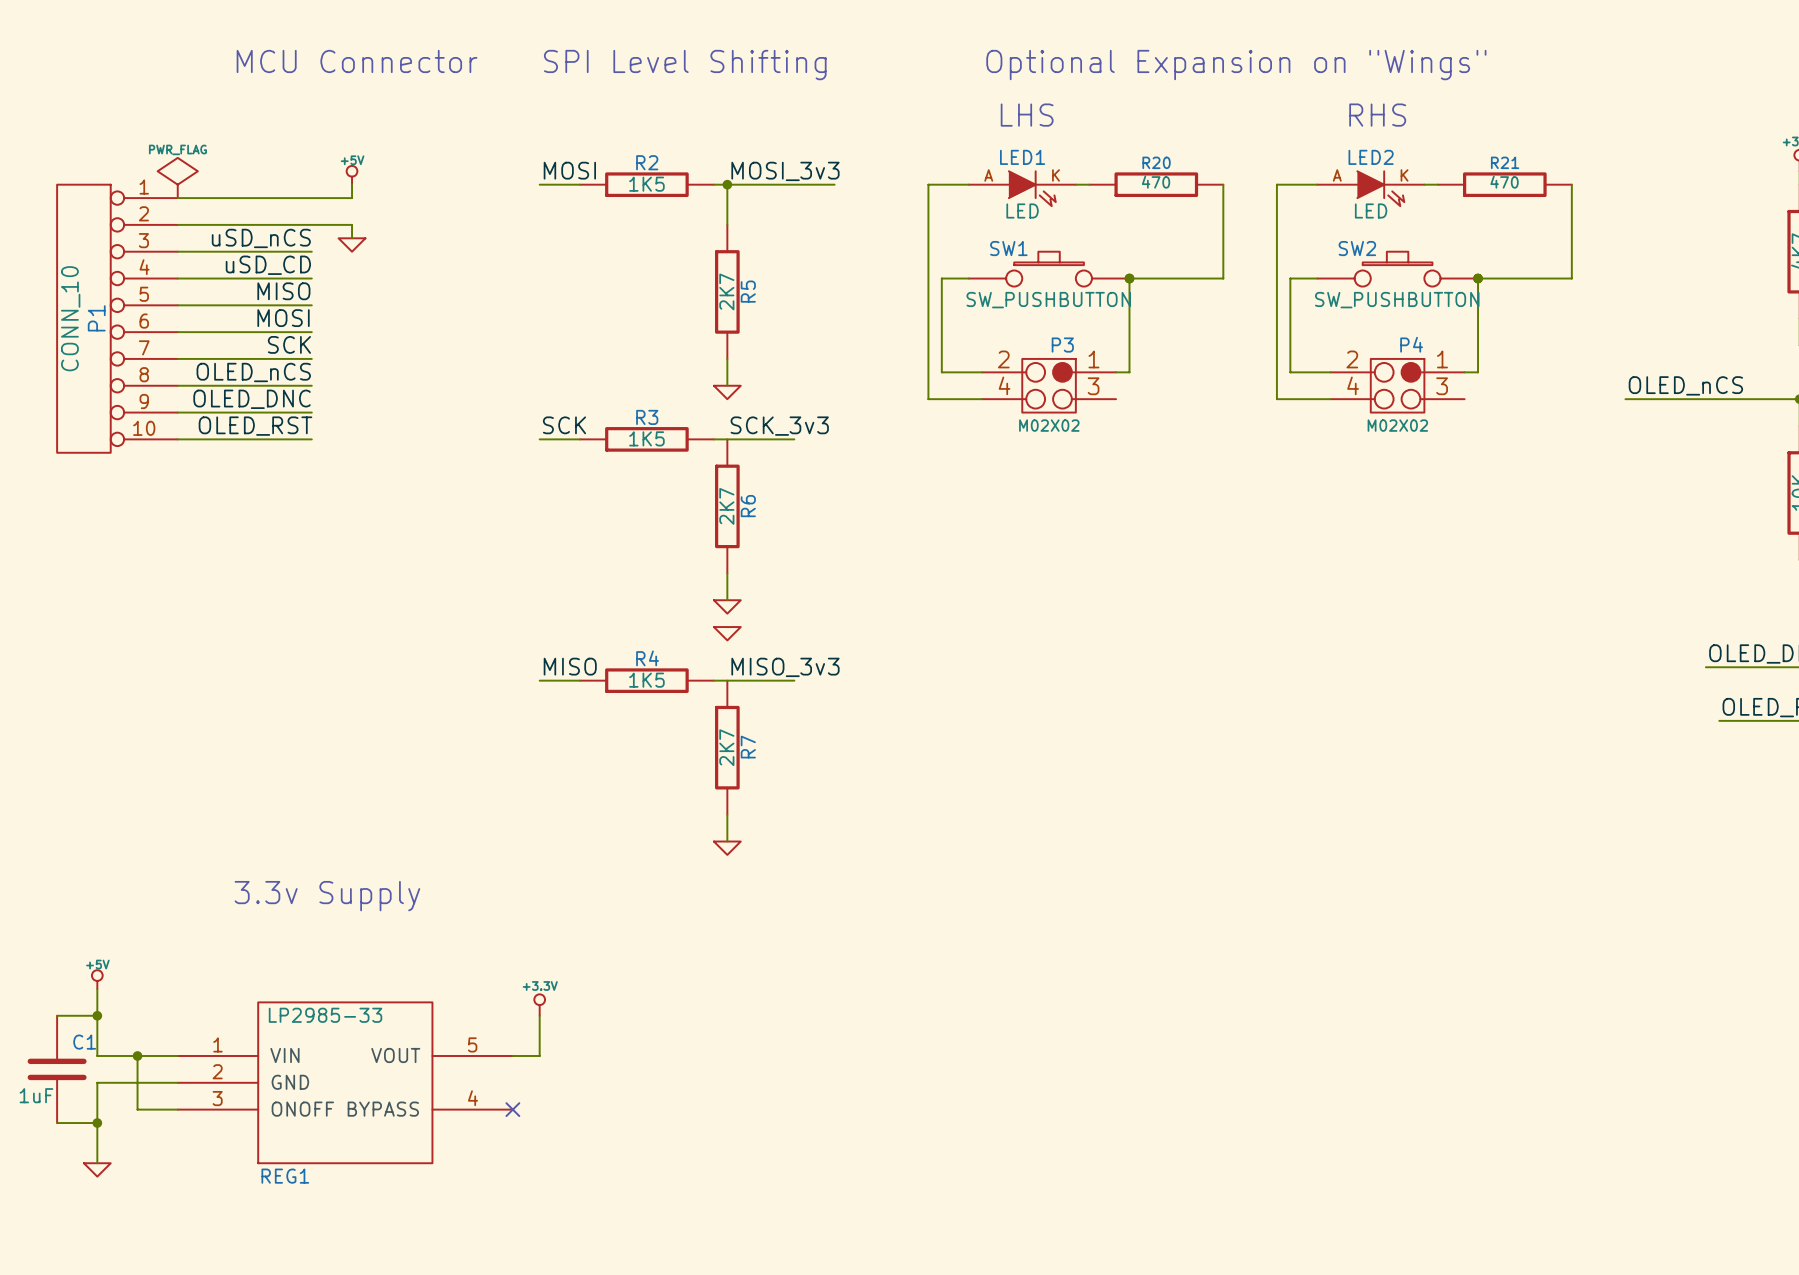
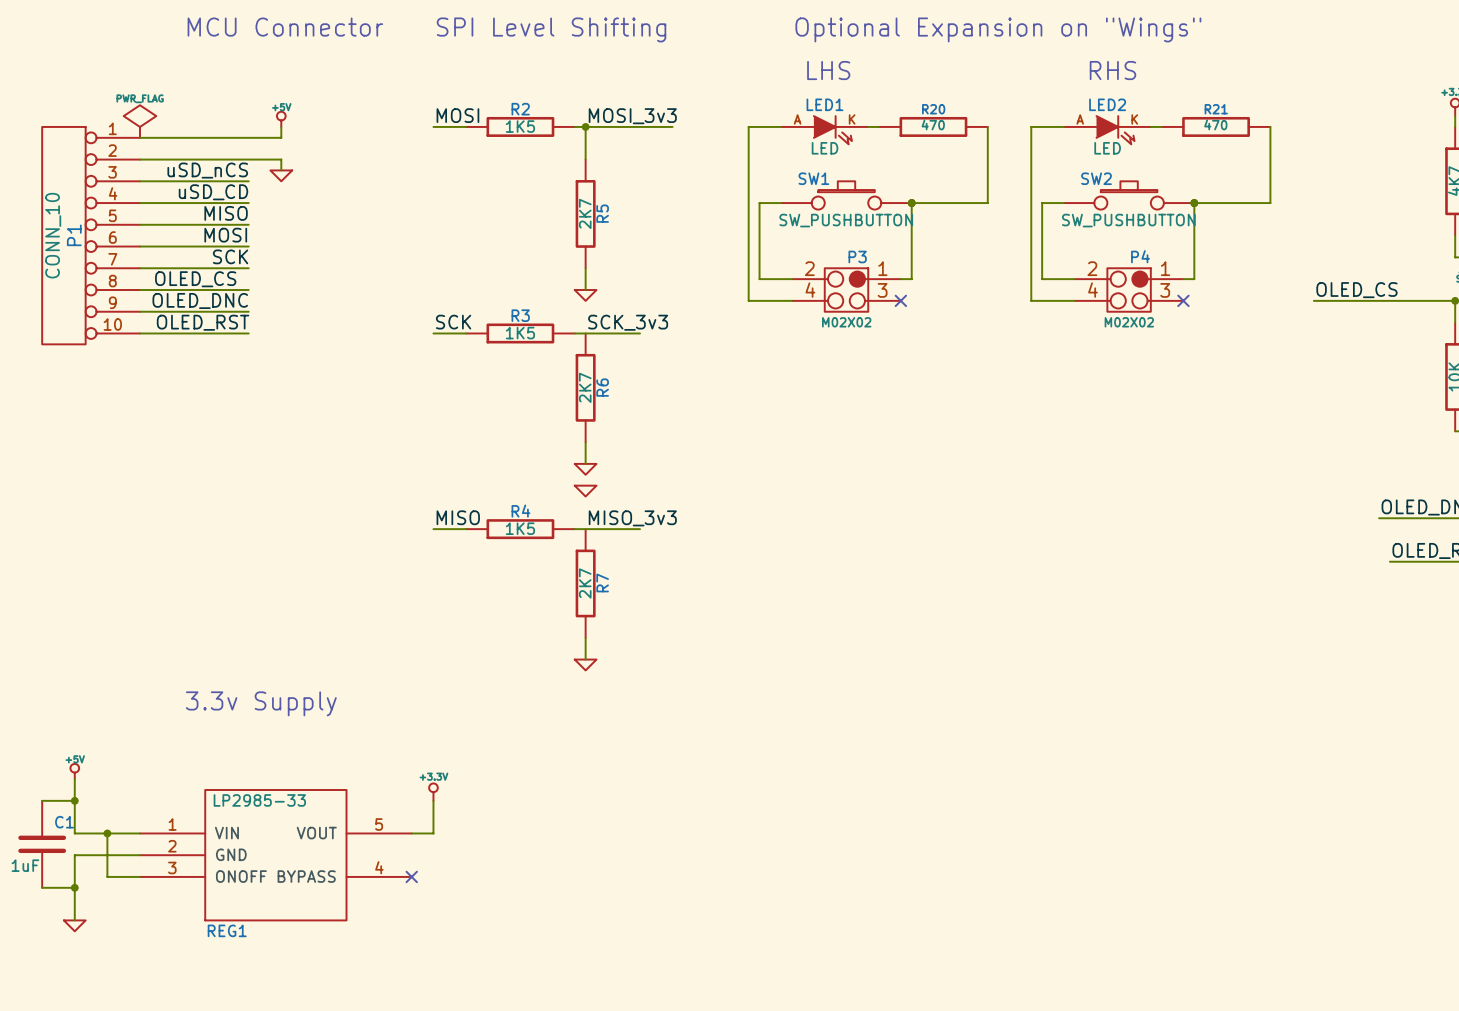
label: OLED_nCS (253, 372) -> OLED_CS (195, 279)
label: OLED_nCS (1685, 385) -> OLED_CS (1356, 290)
no-connect mark: none -> (900, 300)
no-connect mark: none -> (1183, 300)

